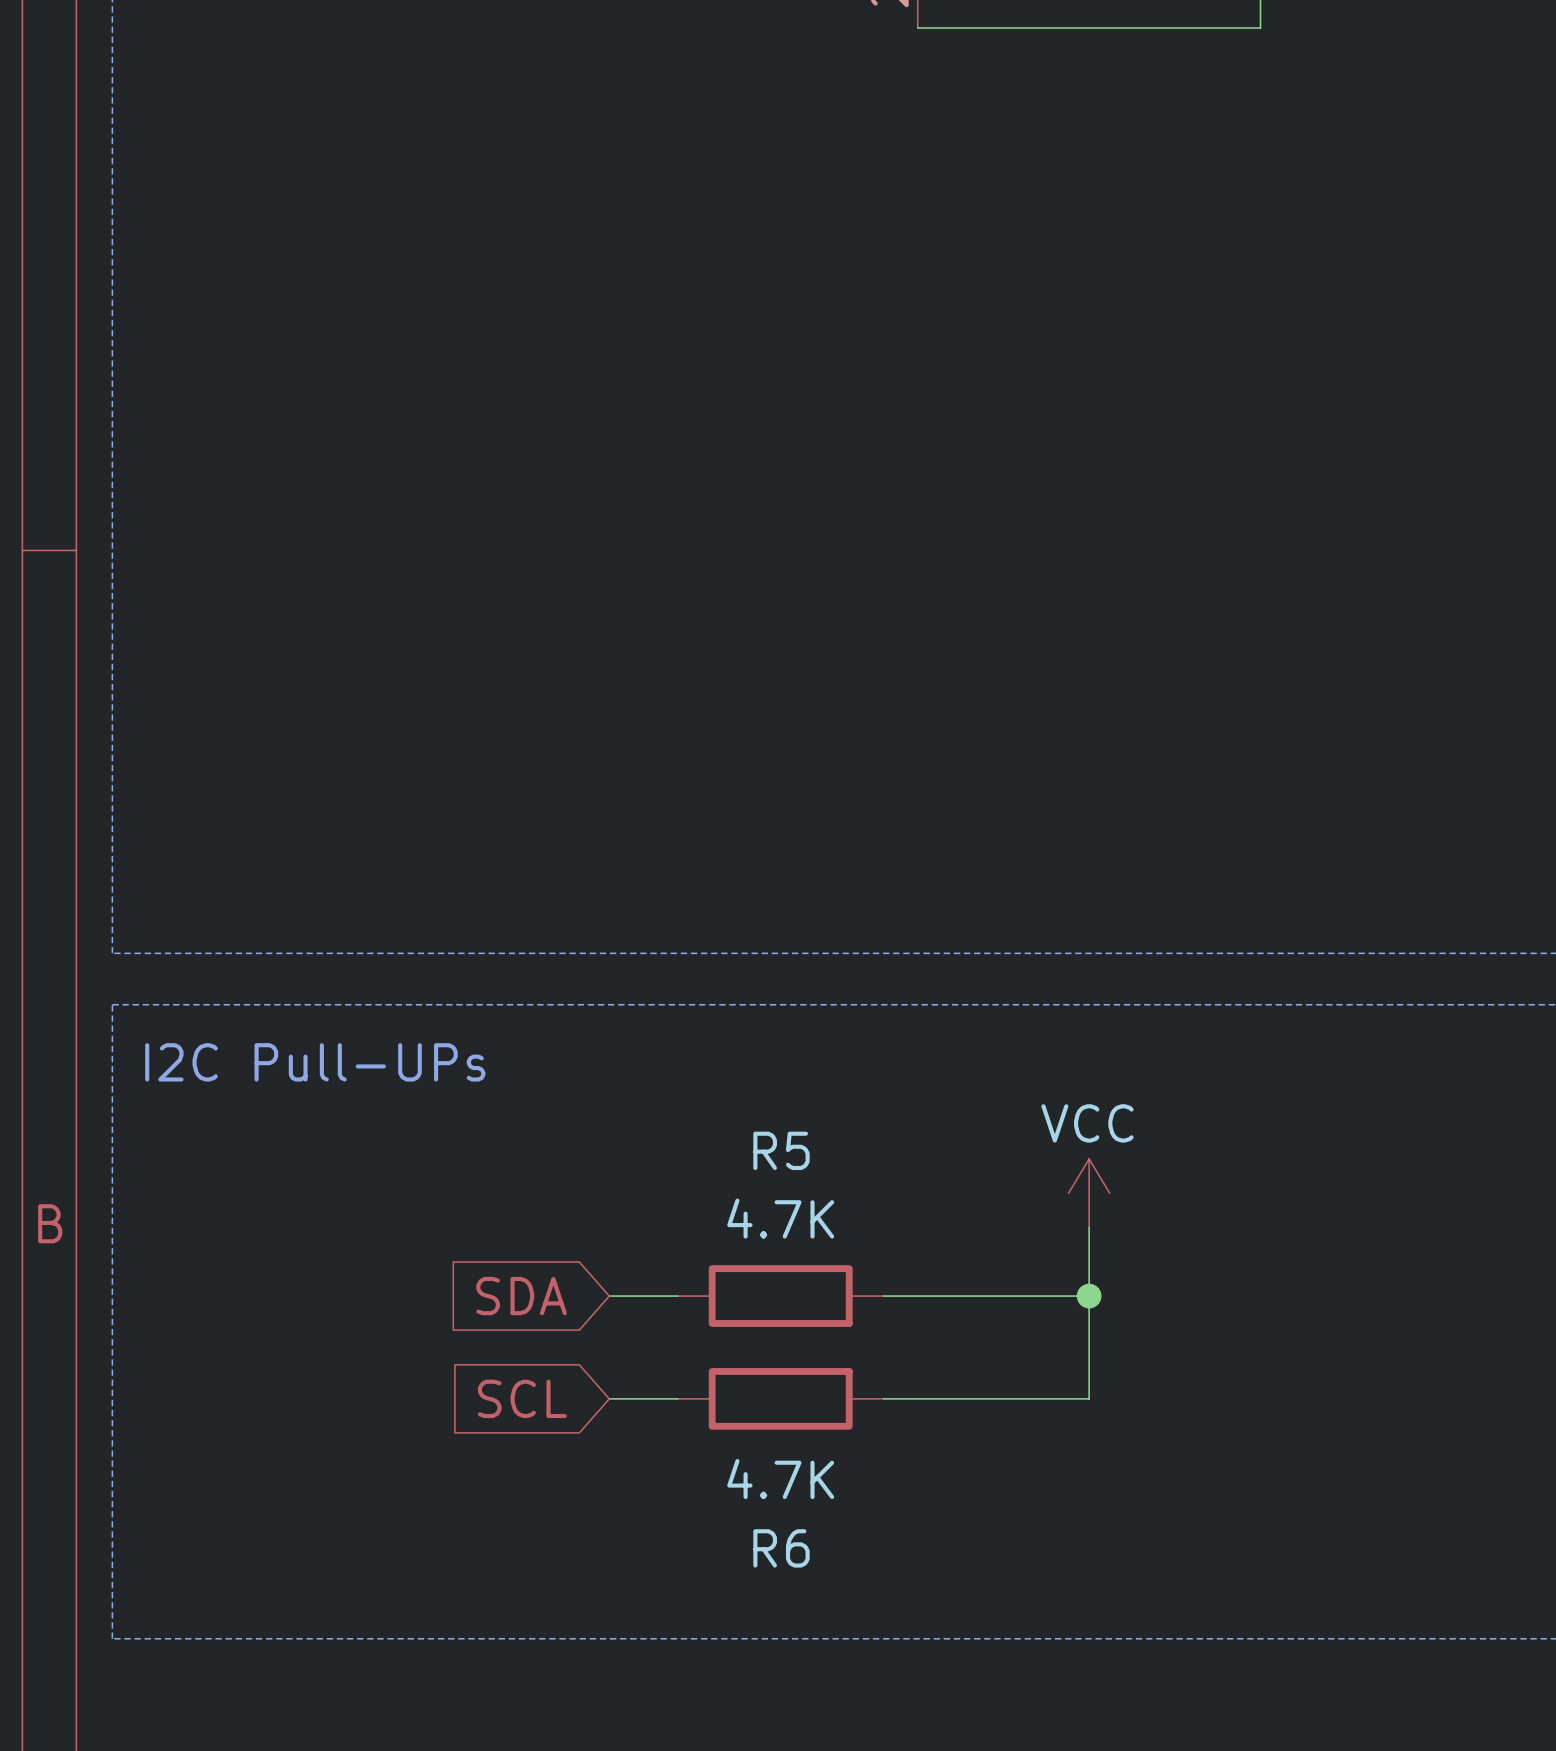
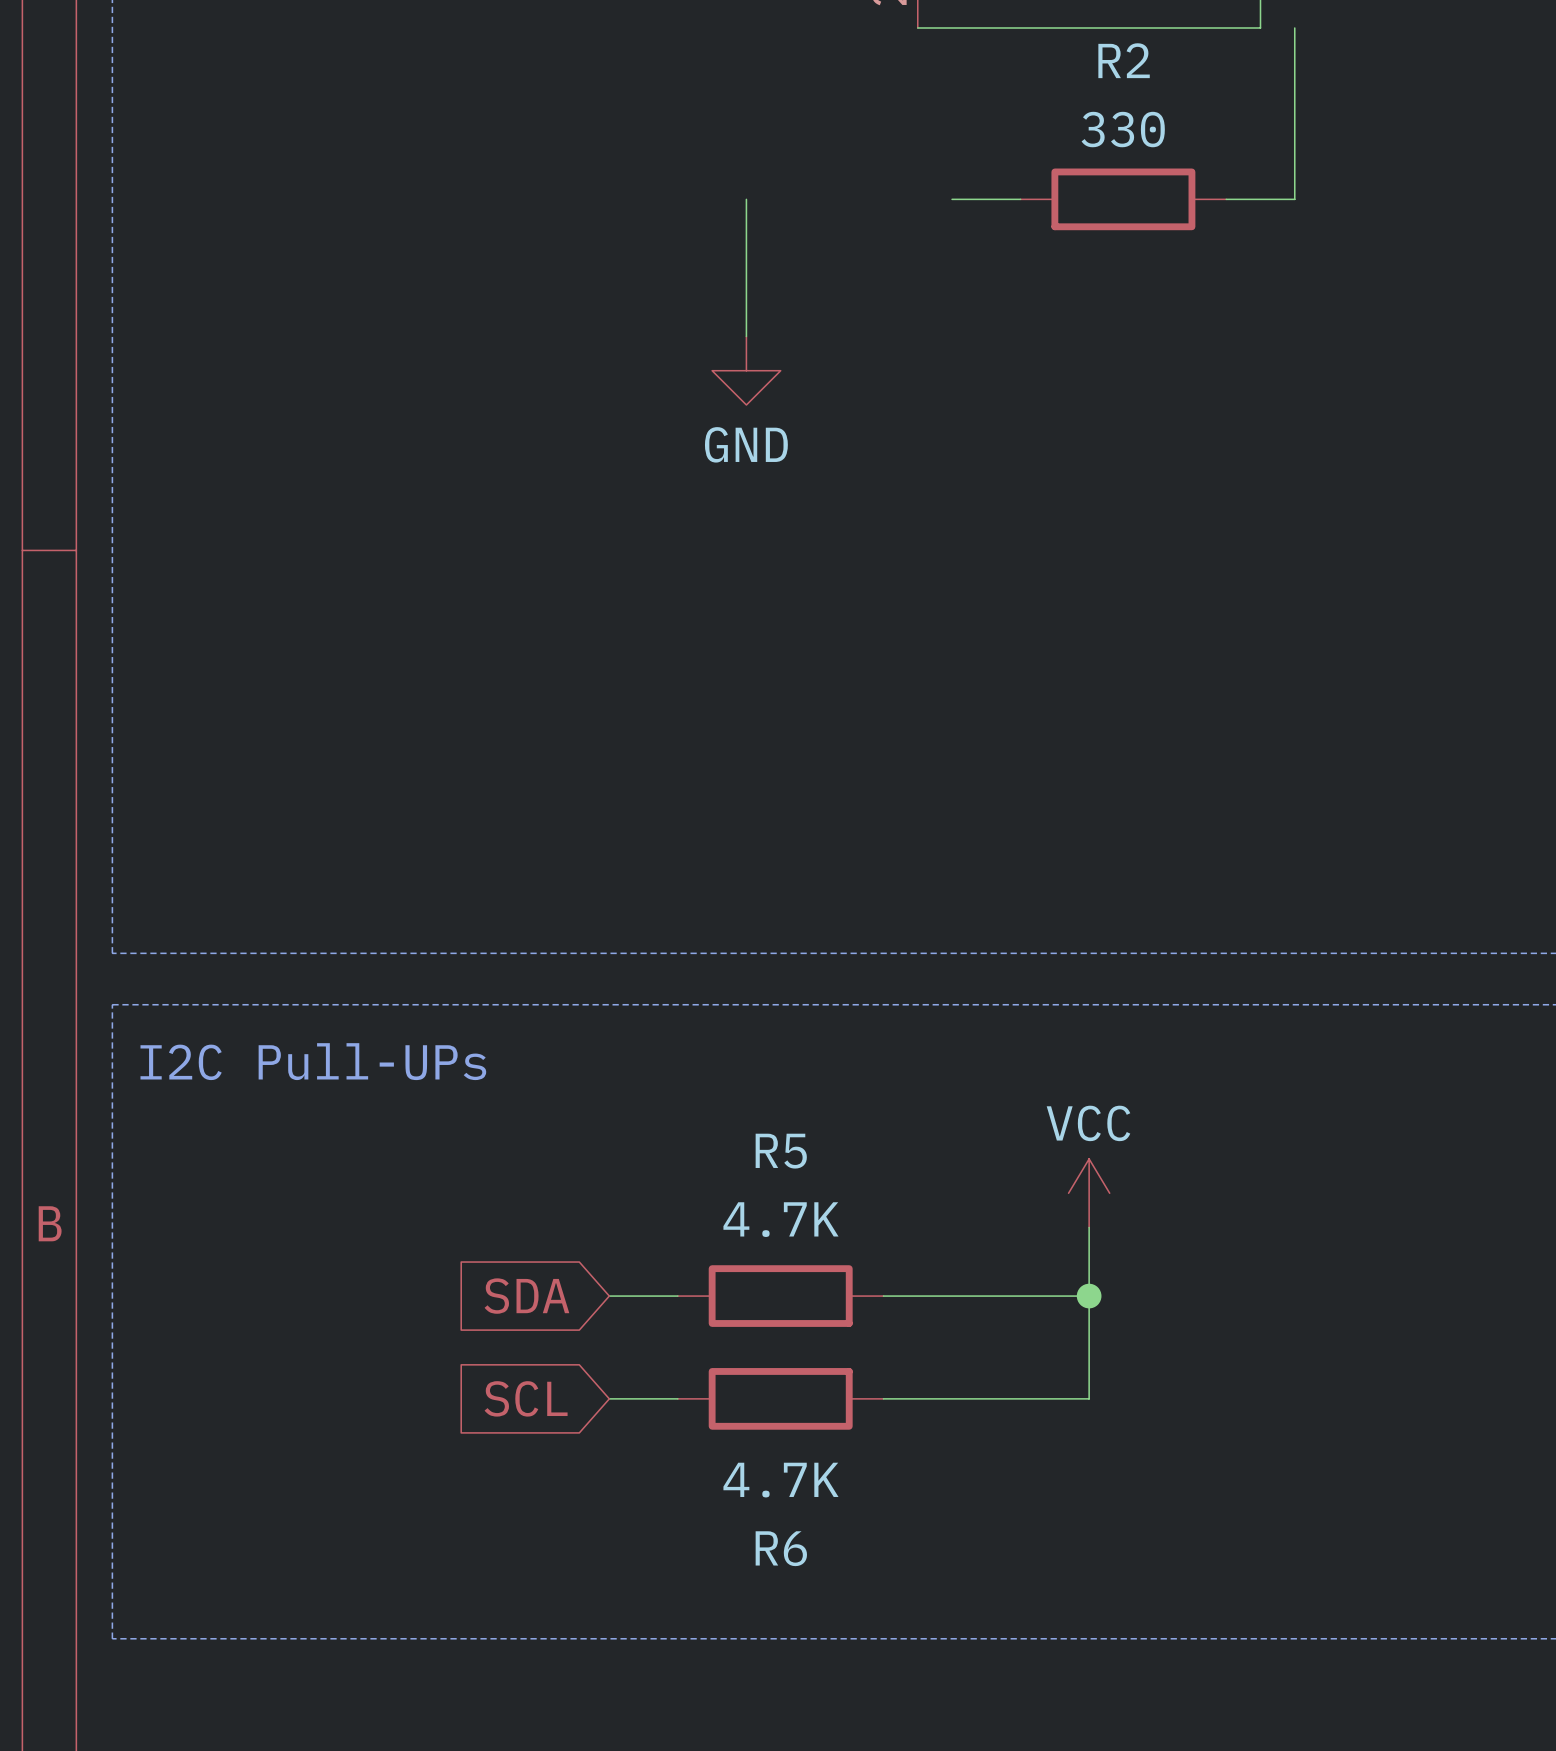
wire: none -> (1294, 27) (1294, 199) (1226, 199)
wire: none -> (746, 199) (746, 336)
wire: none -> (952, 199) (1020, 199)
R2: none -> 330 (1123, 199)
power symbol: none -> GND (746, 370)

